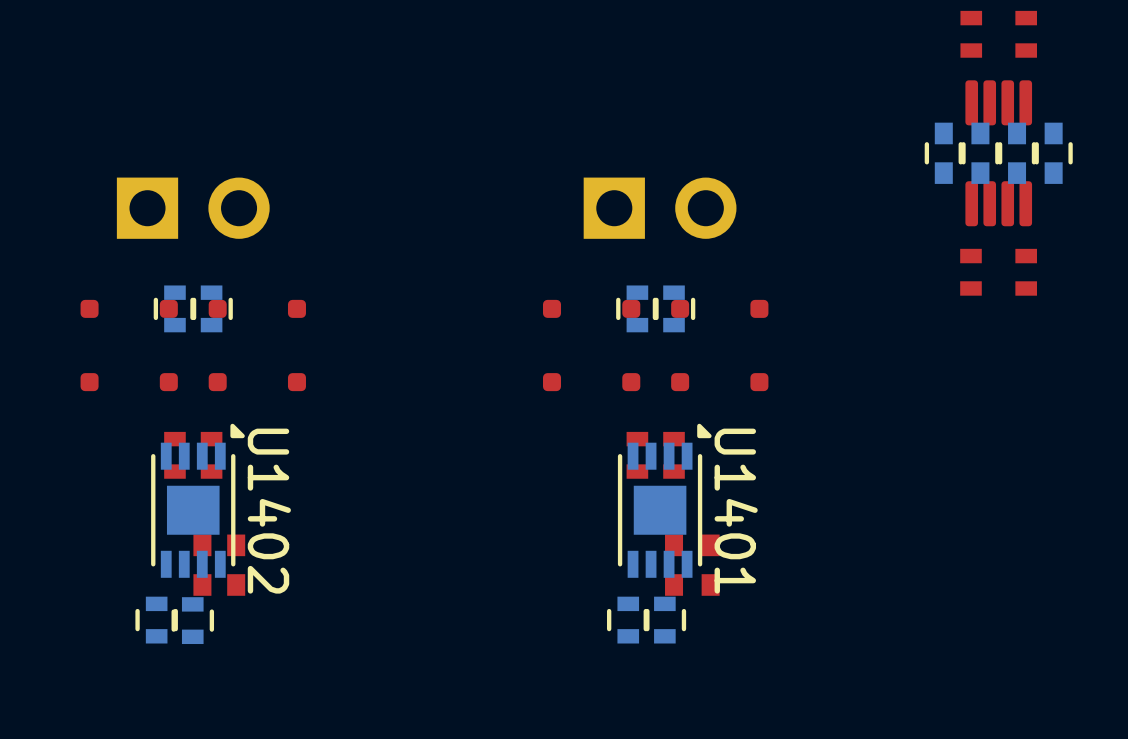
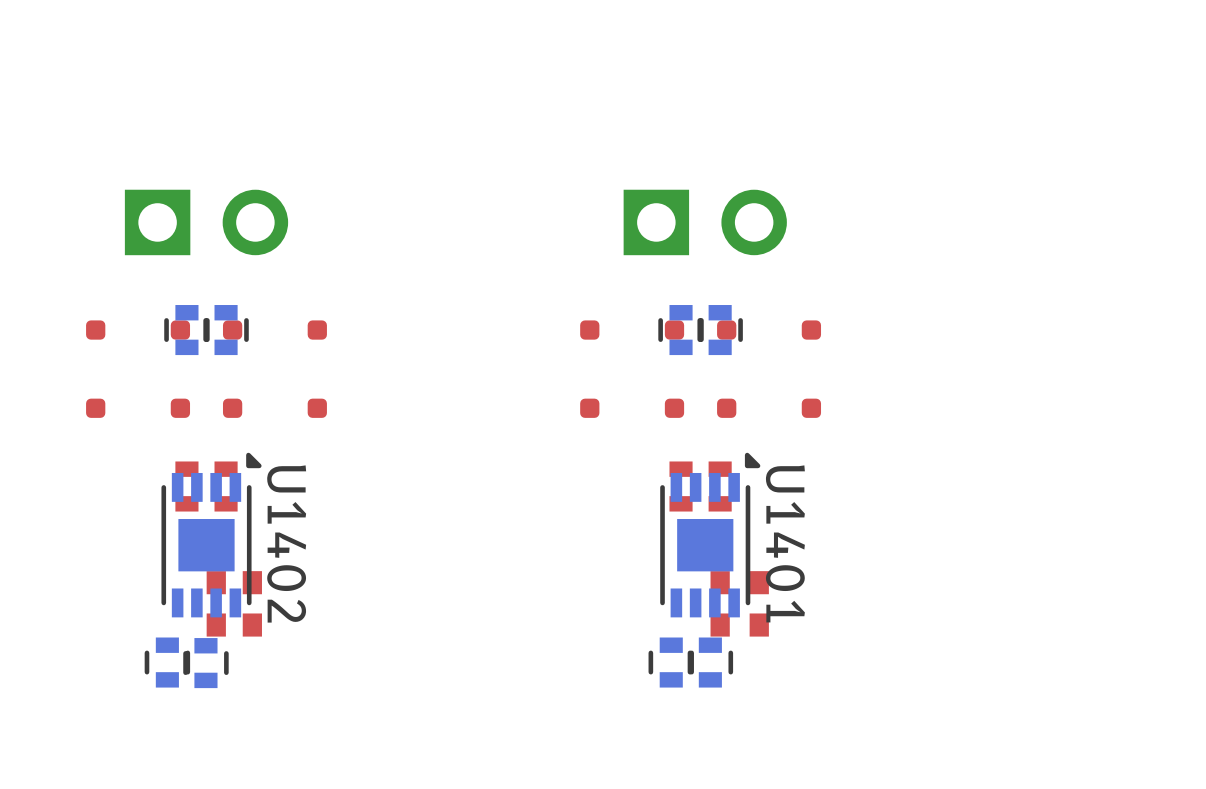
part: (971, 34) -> none
part: (1026, 34) -> none
part: (943, 153) -> none
part: (980, 153) -> none
part: (998, 153) -> none
part: (1017, 153) -> none
part: (1053, 153) -> none
part: (970, 272) -> none
part: (1026, 272) -> none

